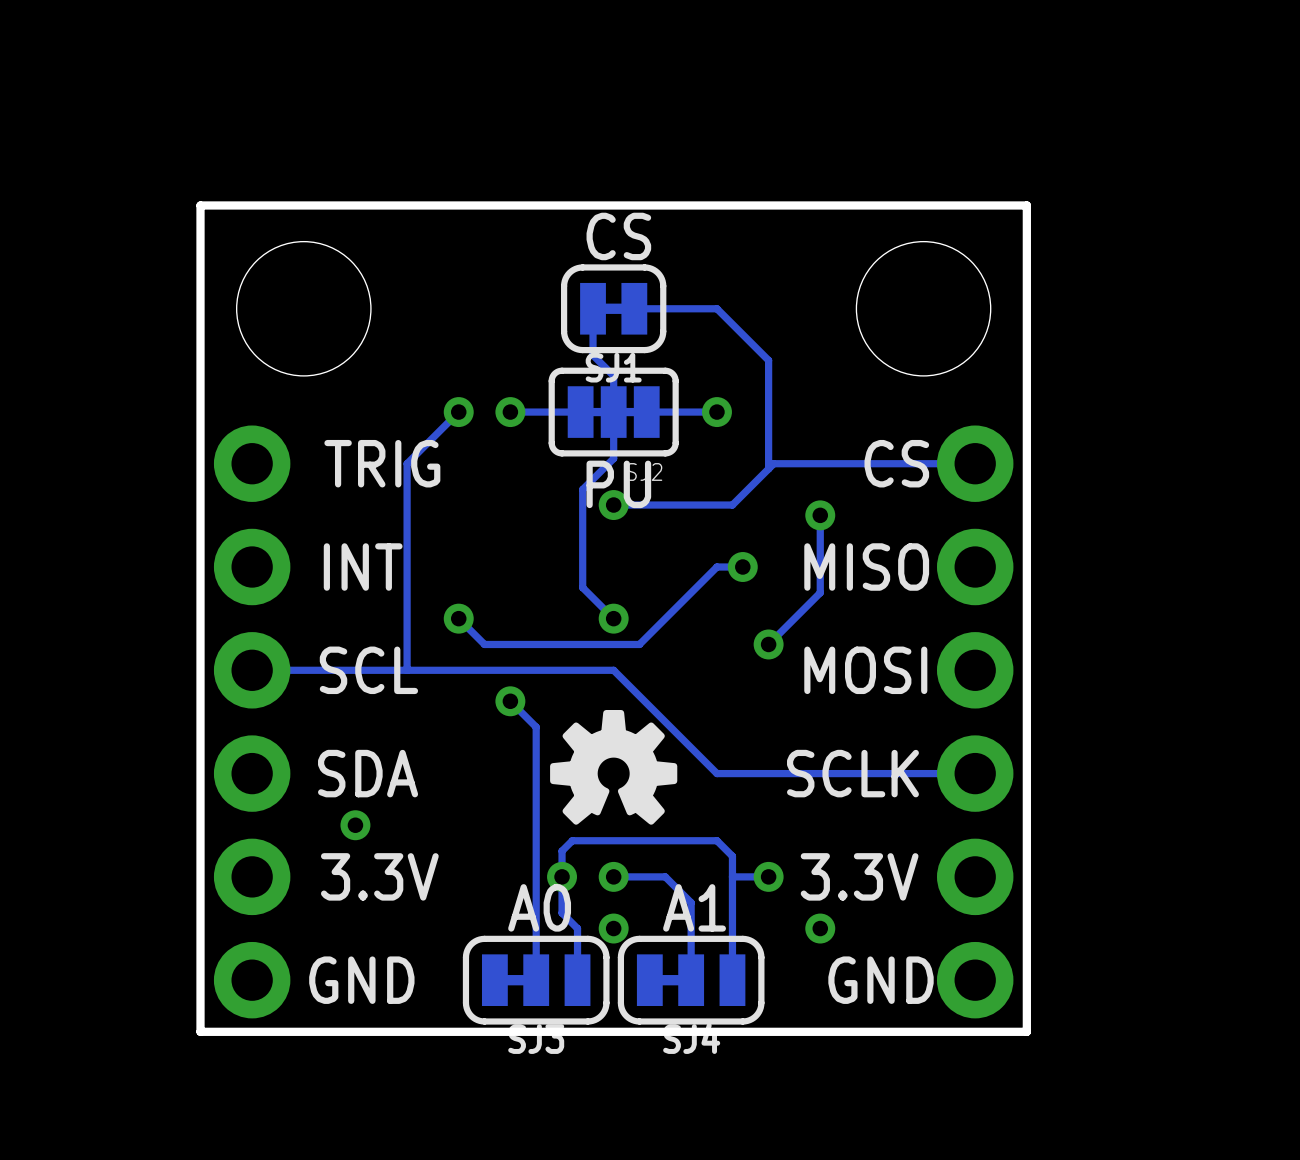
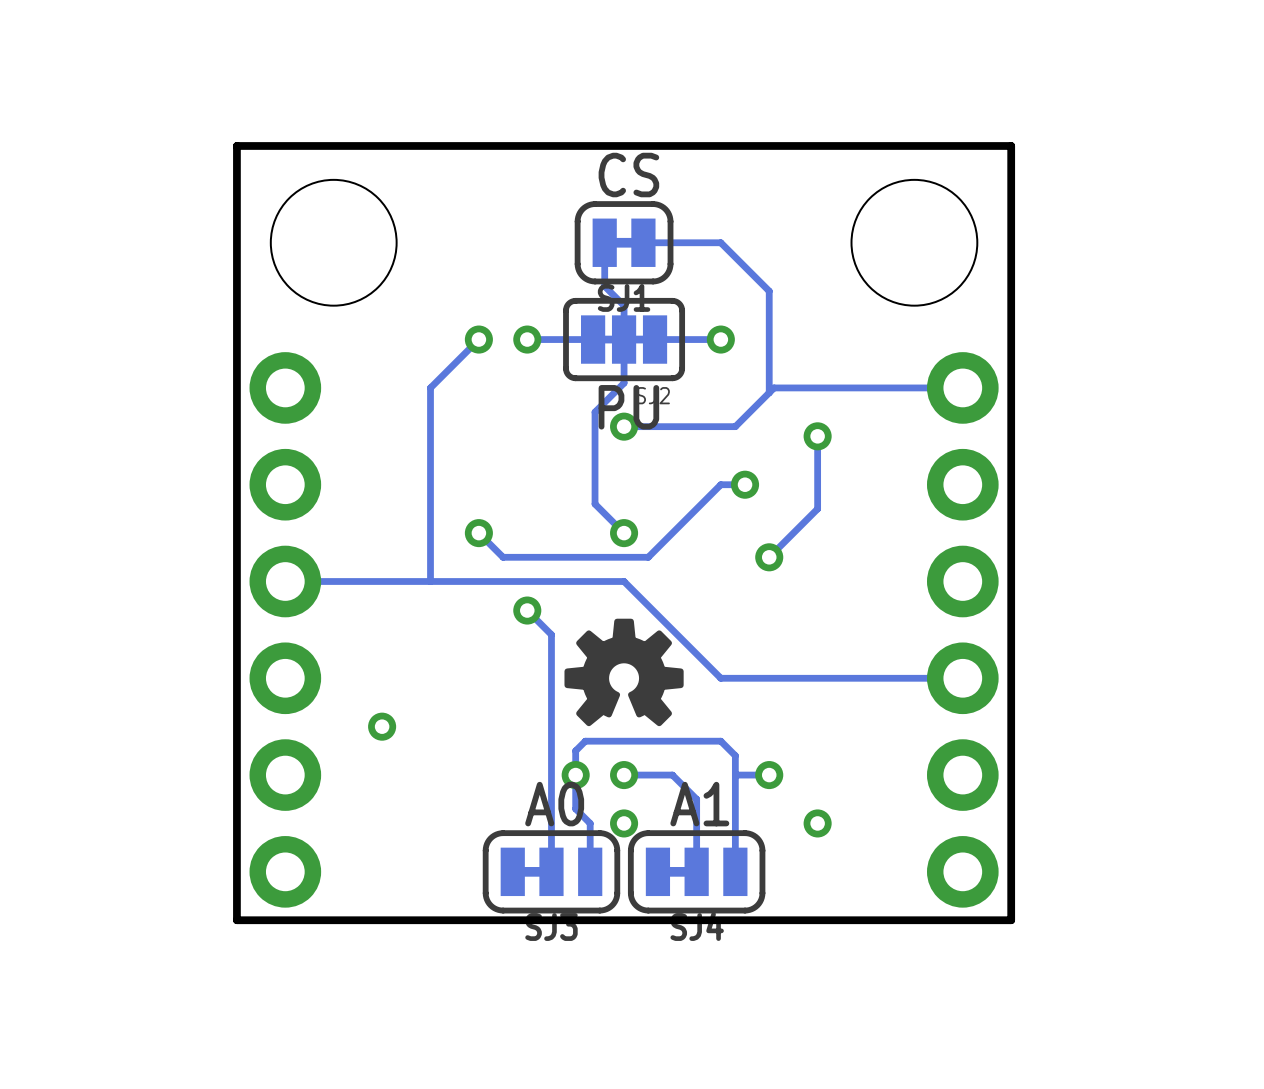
text: TRIG (382, 463) -> none
text: CS (896, 463) -> none
text: INT (363, 567) -> none
text: MISO (866, 567) -> none
text: SCL (368, 670) -> none
text: MOSI (865, 670) -> none
text: SDA (368, 773) -> none
text: SCLK (852, 773) -> none
text: 3.3V (379, 876) -> none
text: 3.3V (859, 876) -> none
text: GND (361, 980) -> none
text: GND (881, 980) -> none

